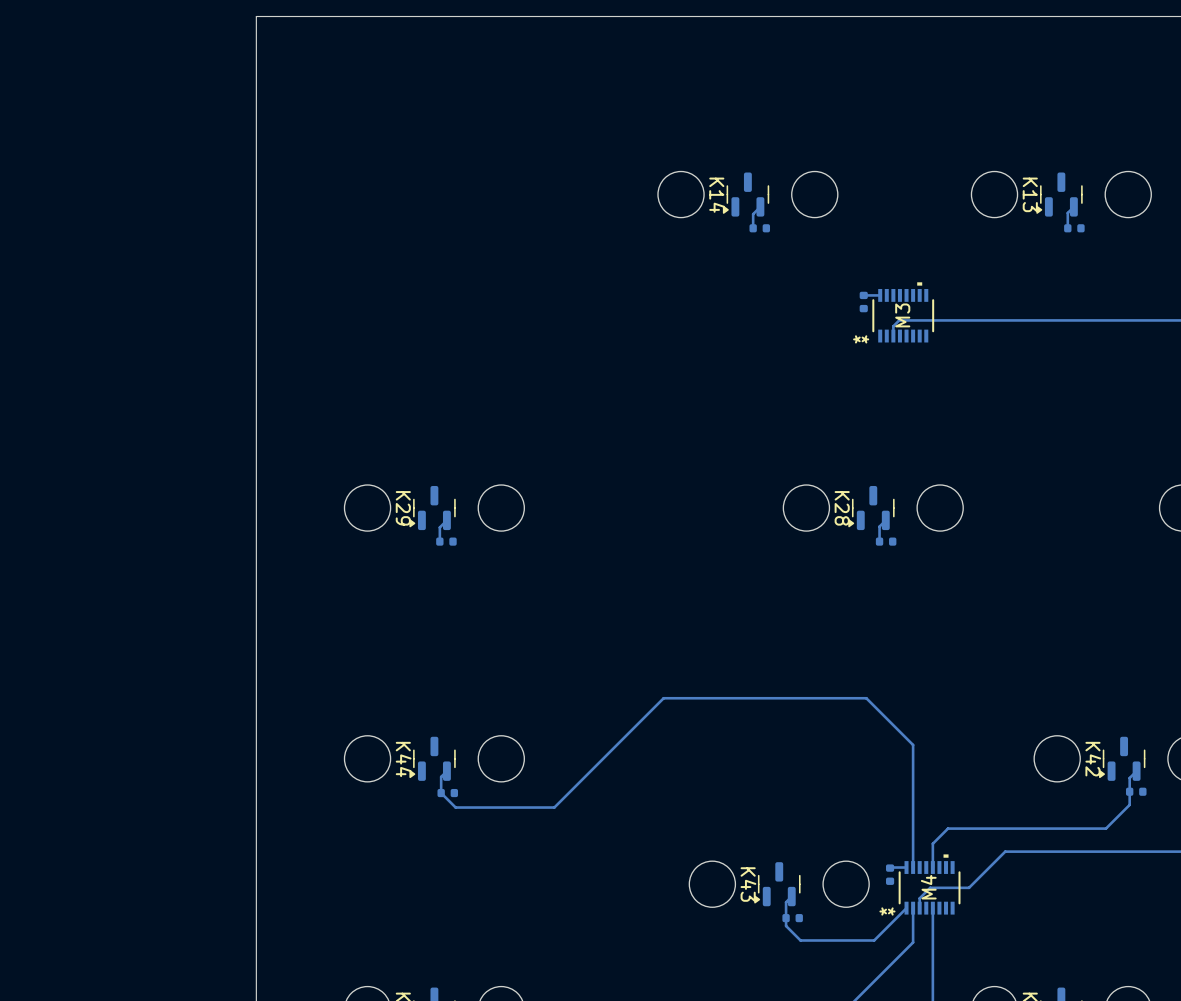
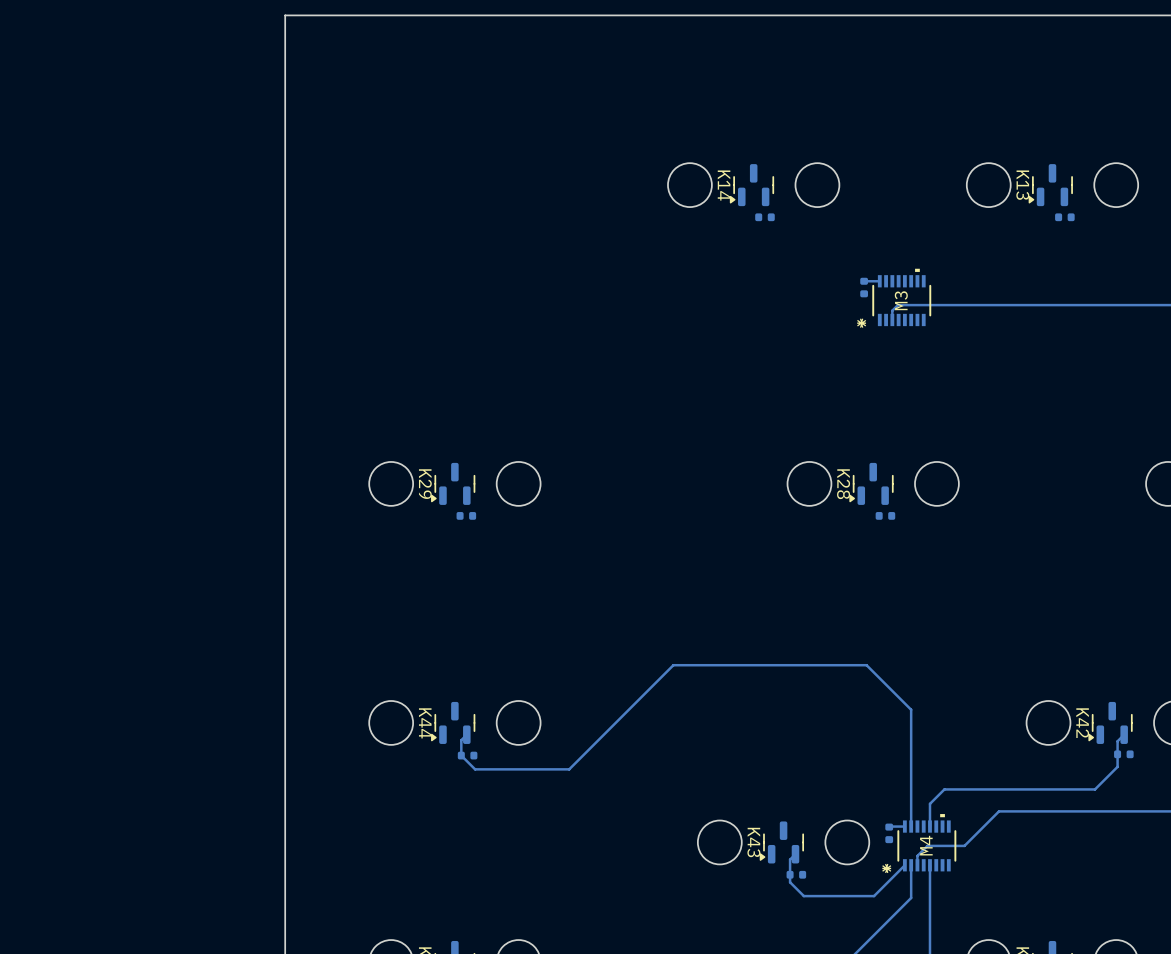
bottom track: (760, 206) (753, 214) (753, 228) -> none
bottom track: (1073, 206) (1067, 212) (1067, 228) -> none
bottom track: (446, 520) (439, 527) (439, 541) -> none
bottom track: (885, 520) (879, 526) (879, 541) -> none

